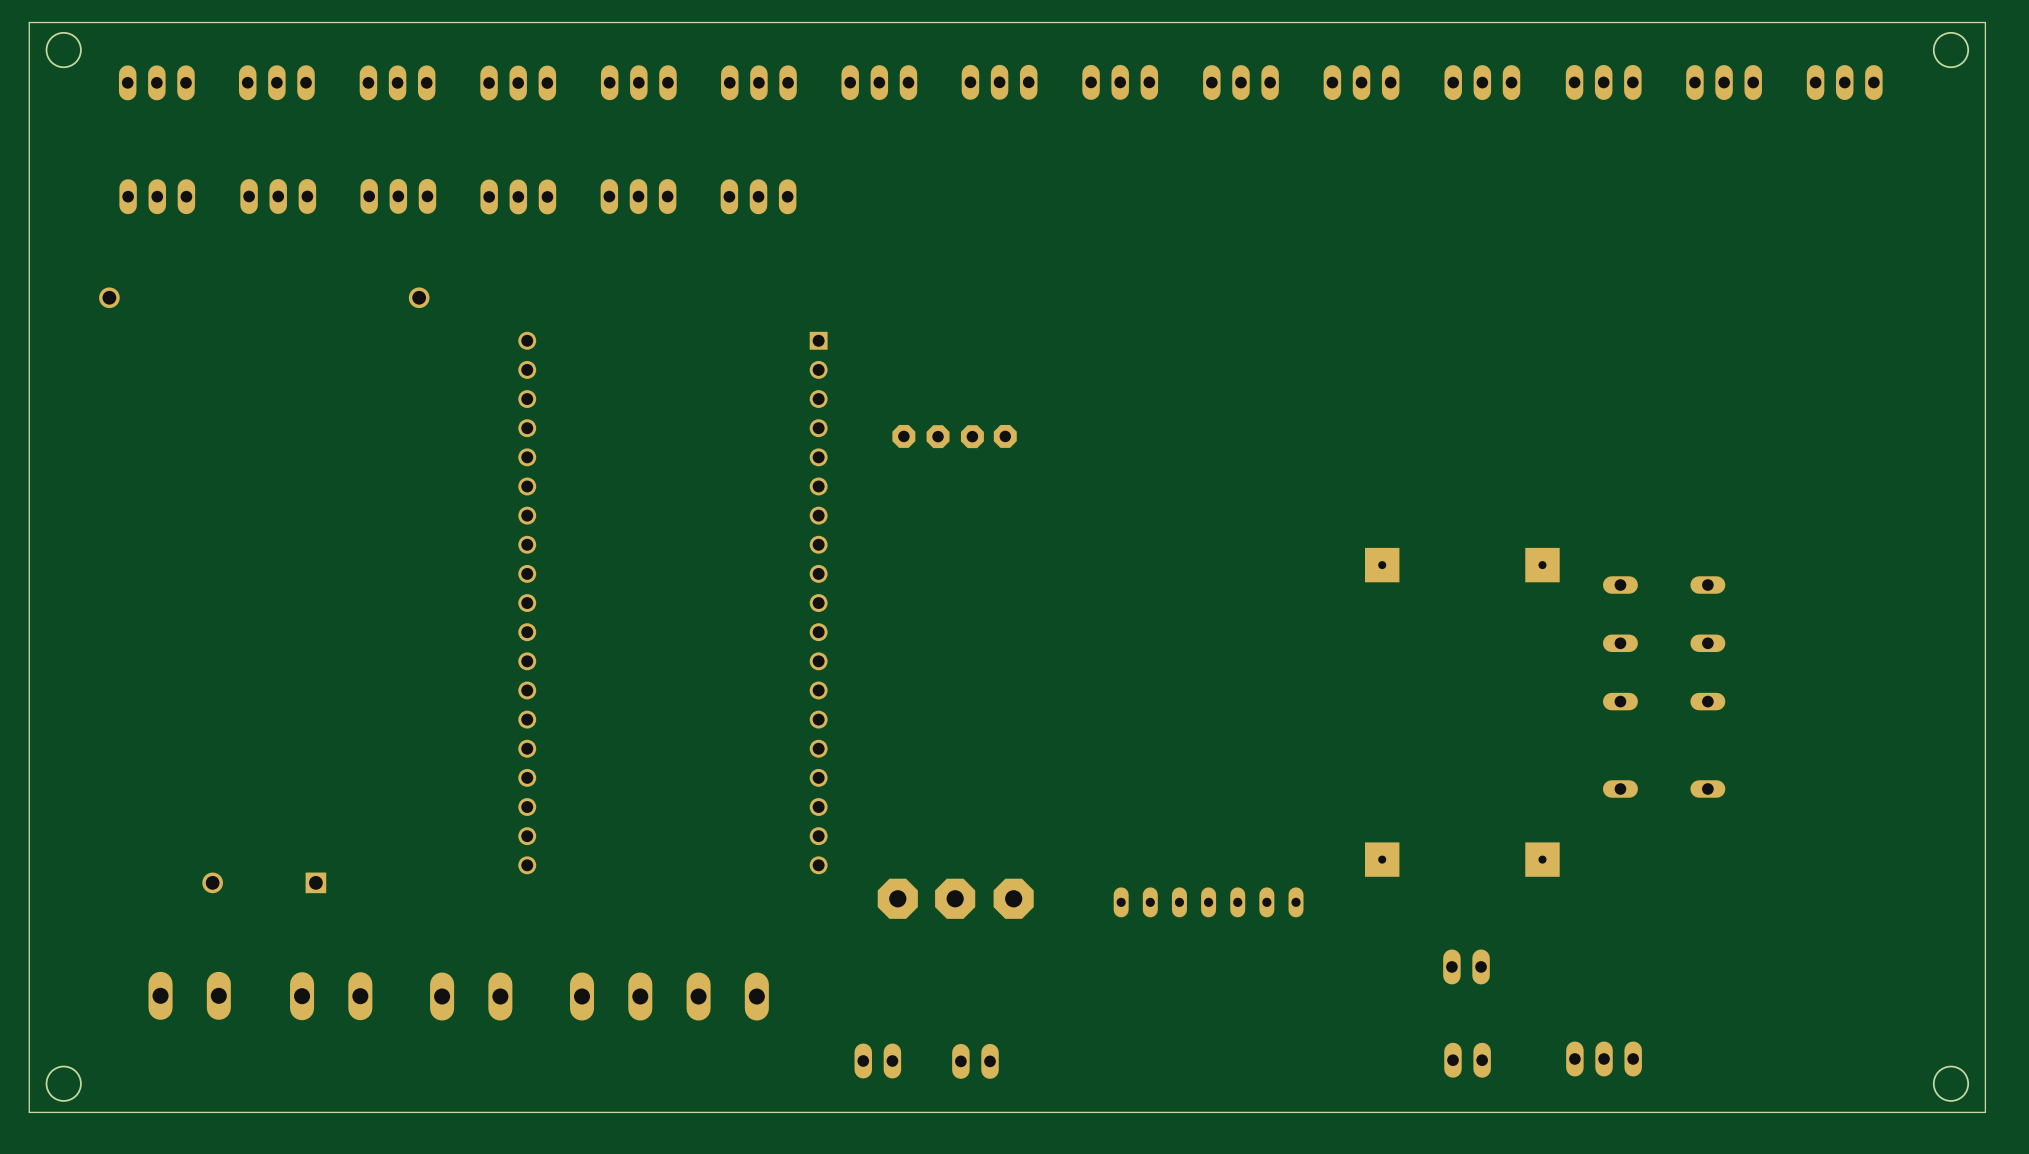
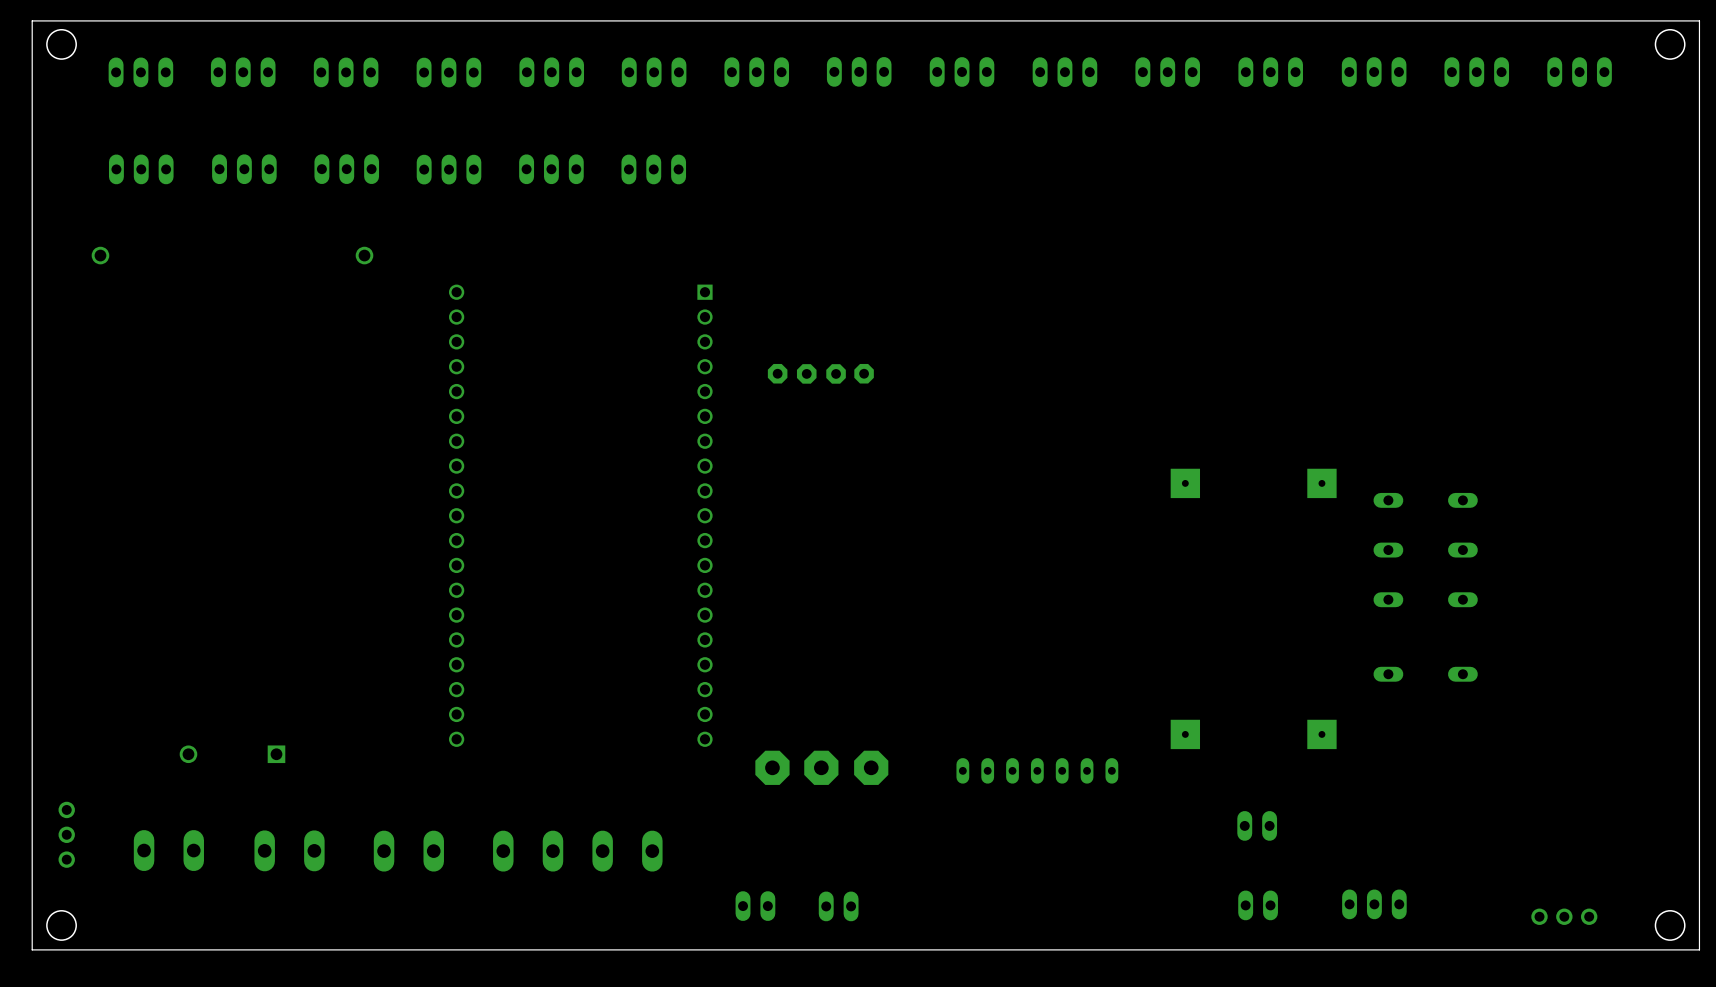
part: none -> (66, 834)
part: none -> (1564, 916)

